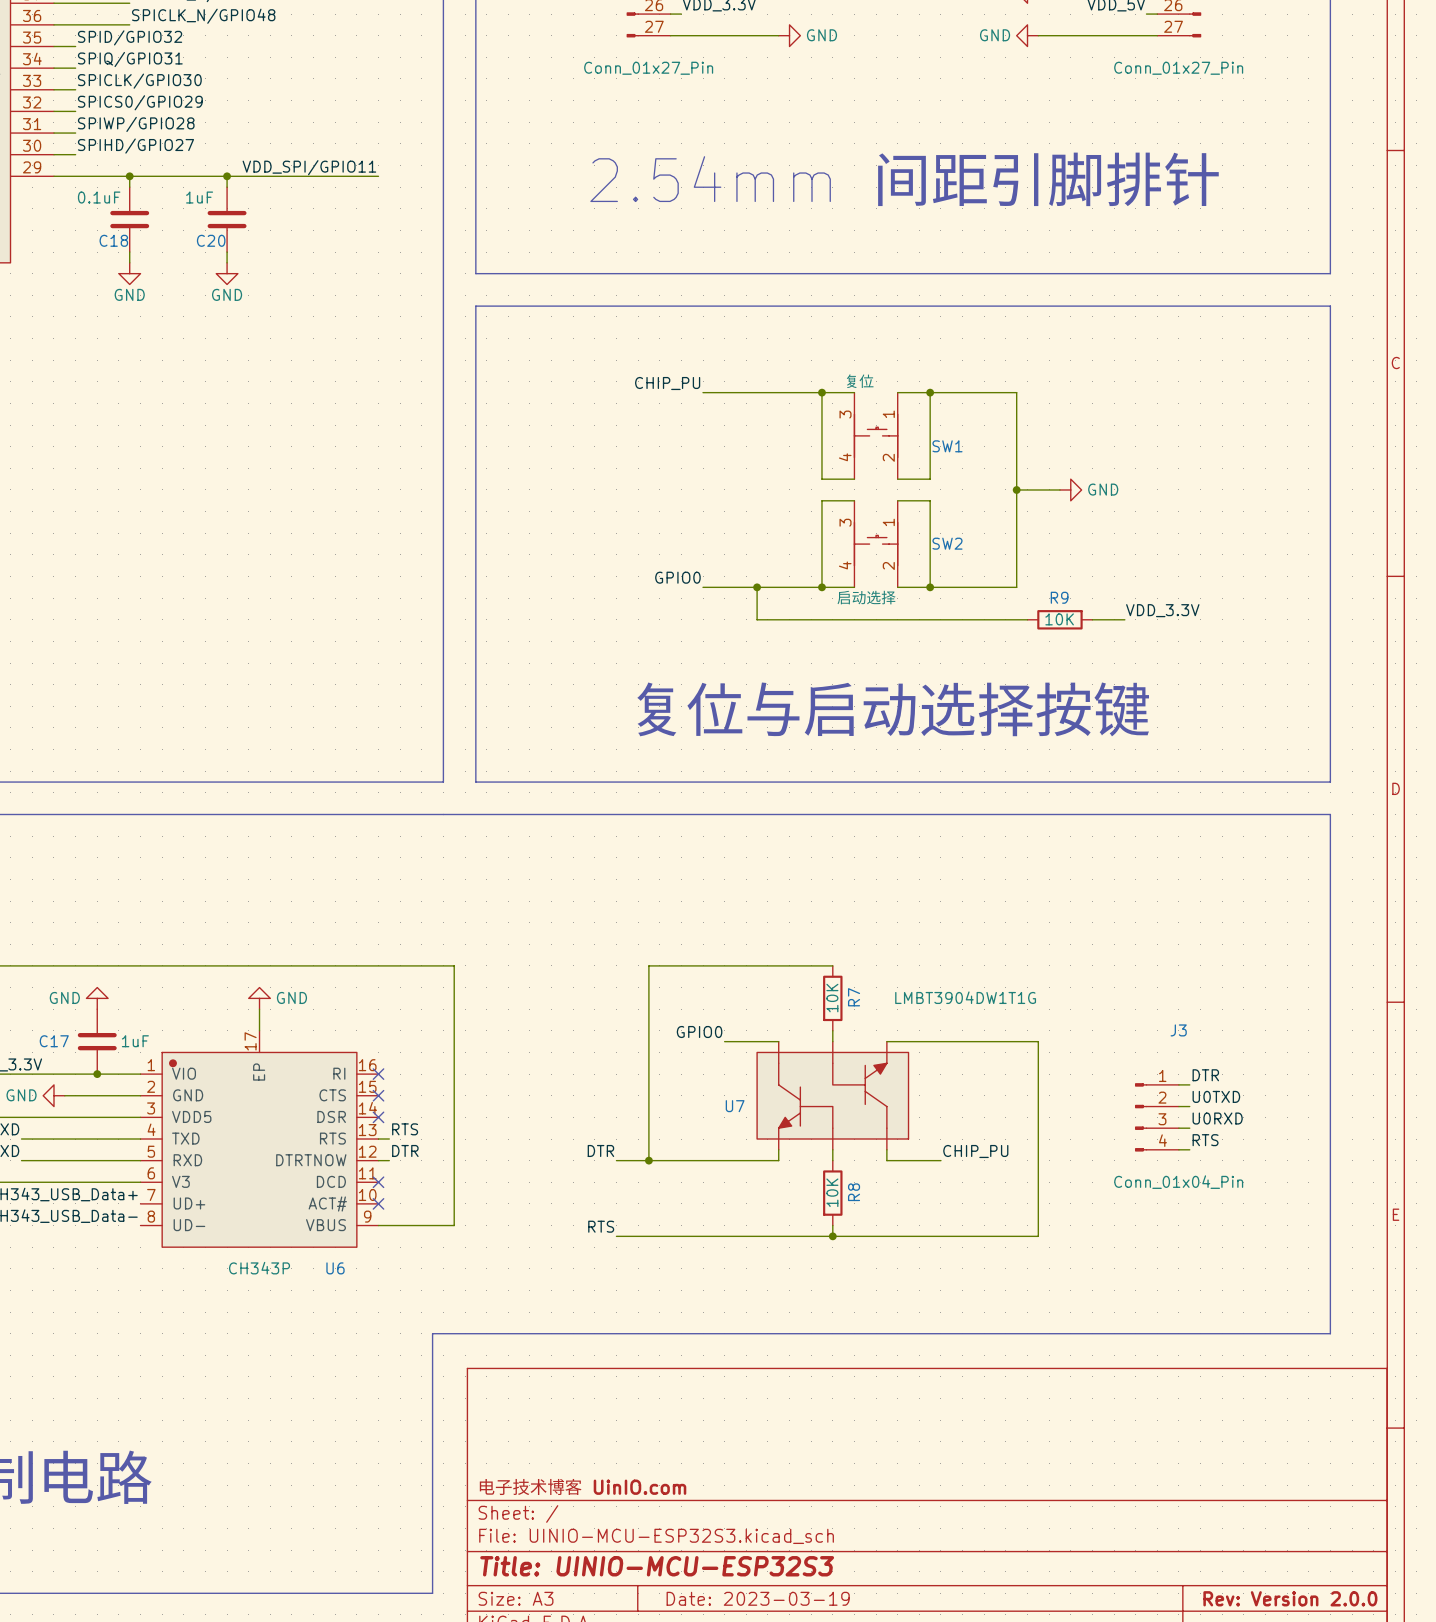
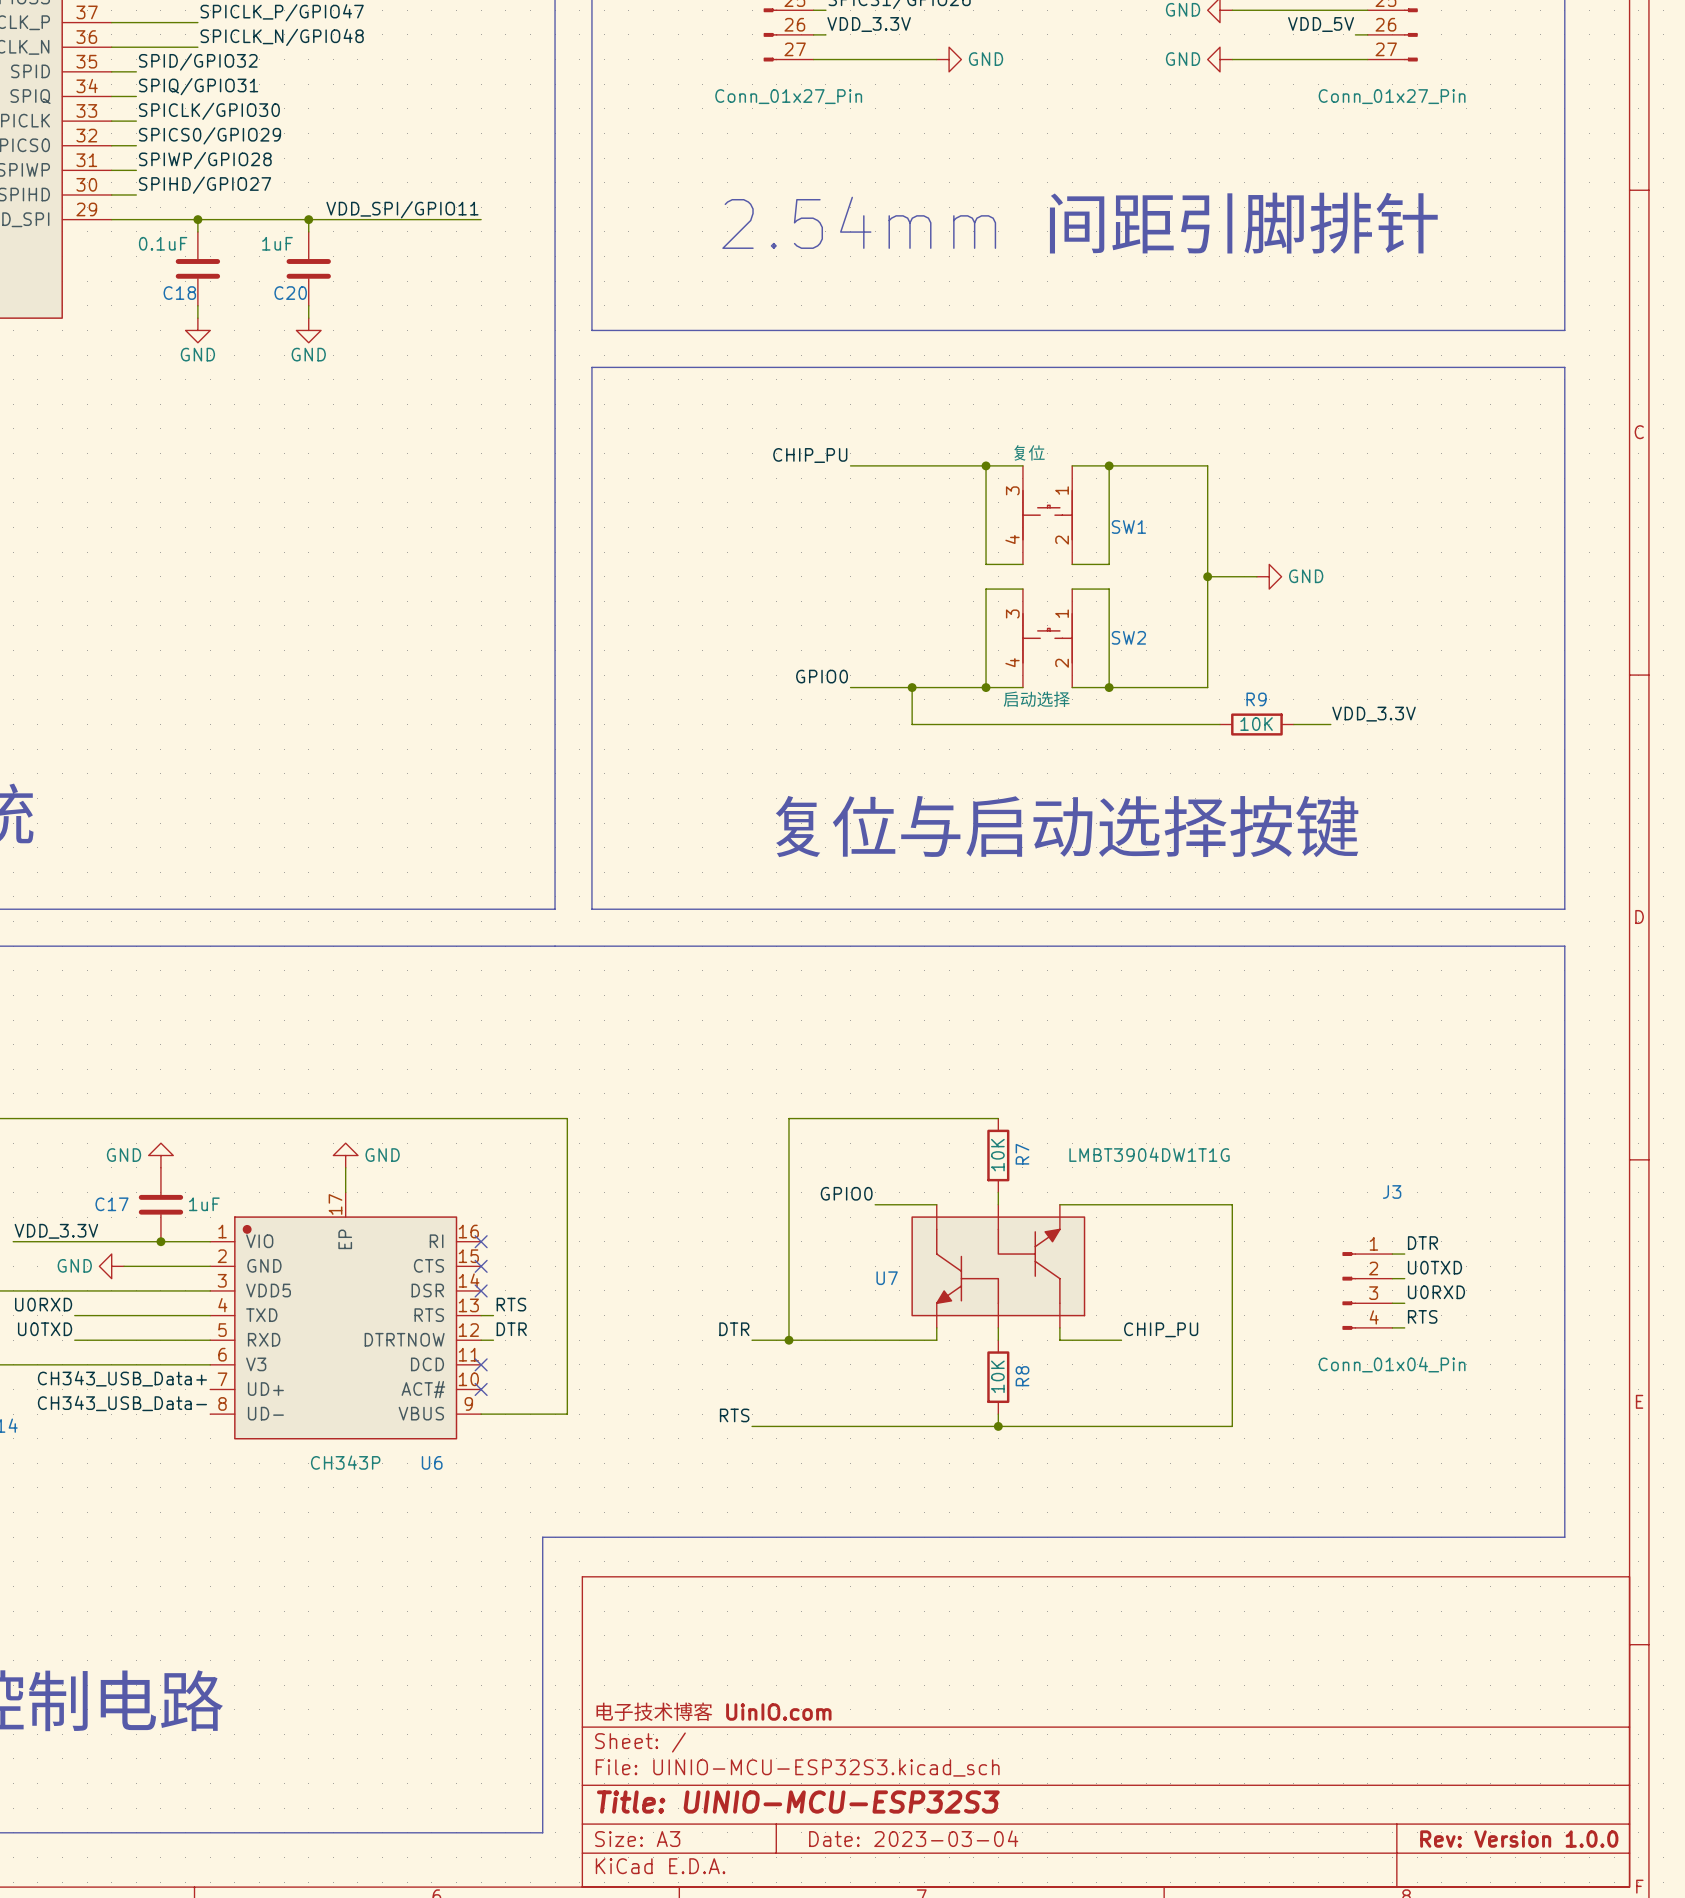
title block: Date: 2023-03-19 (758, 1598) -> Date: 2023-03-04 (913, 1838)
title block: Rev: Version 2.0.0 (1290, 1598) -> Rev: Version 1.0.0 (1519, 1839)

